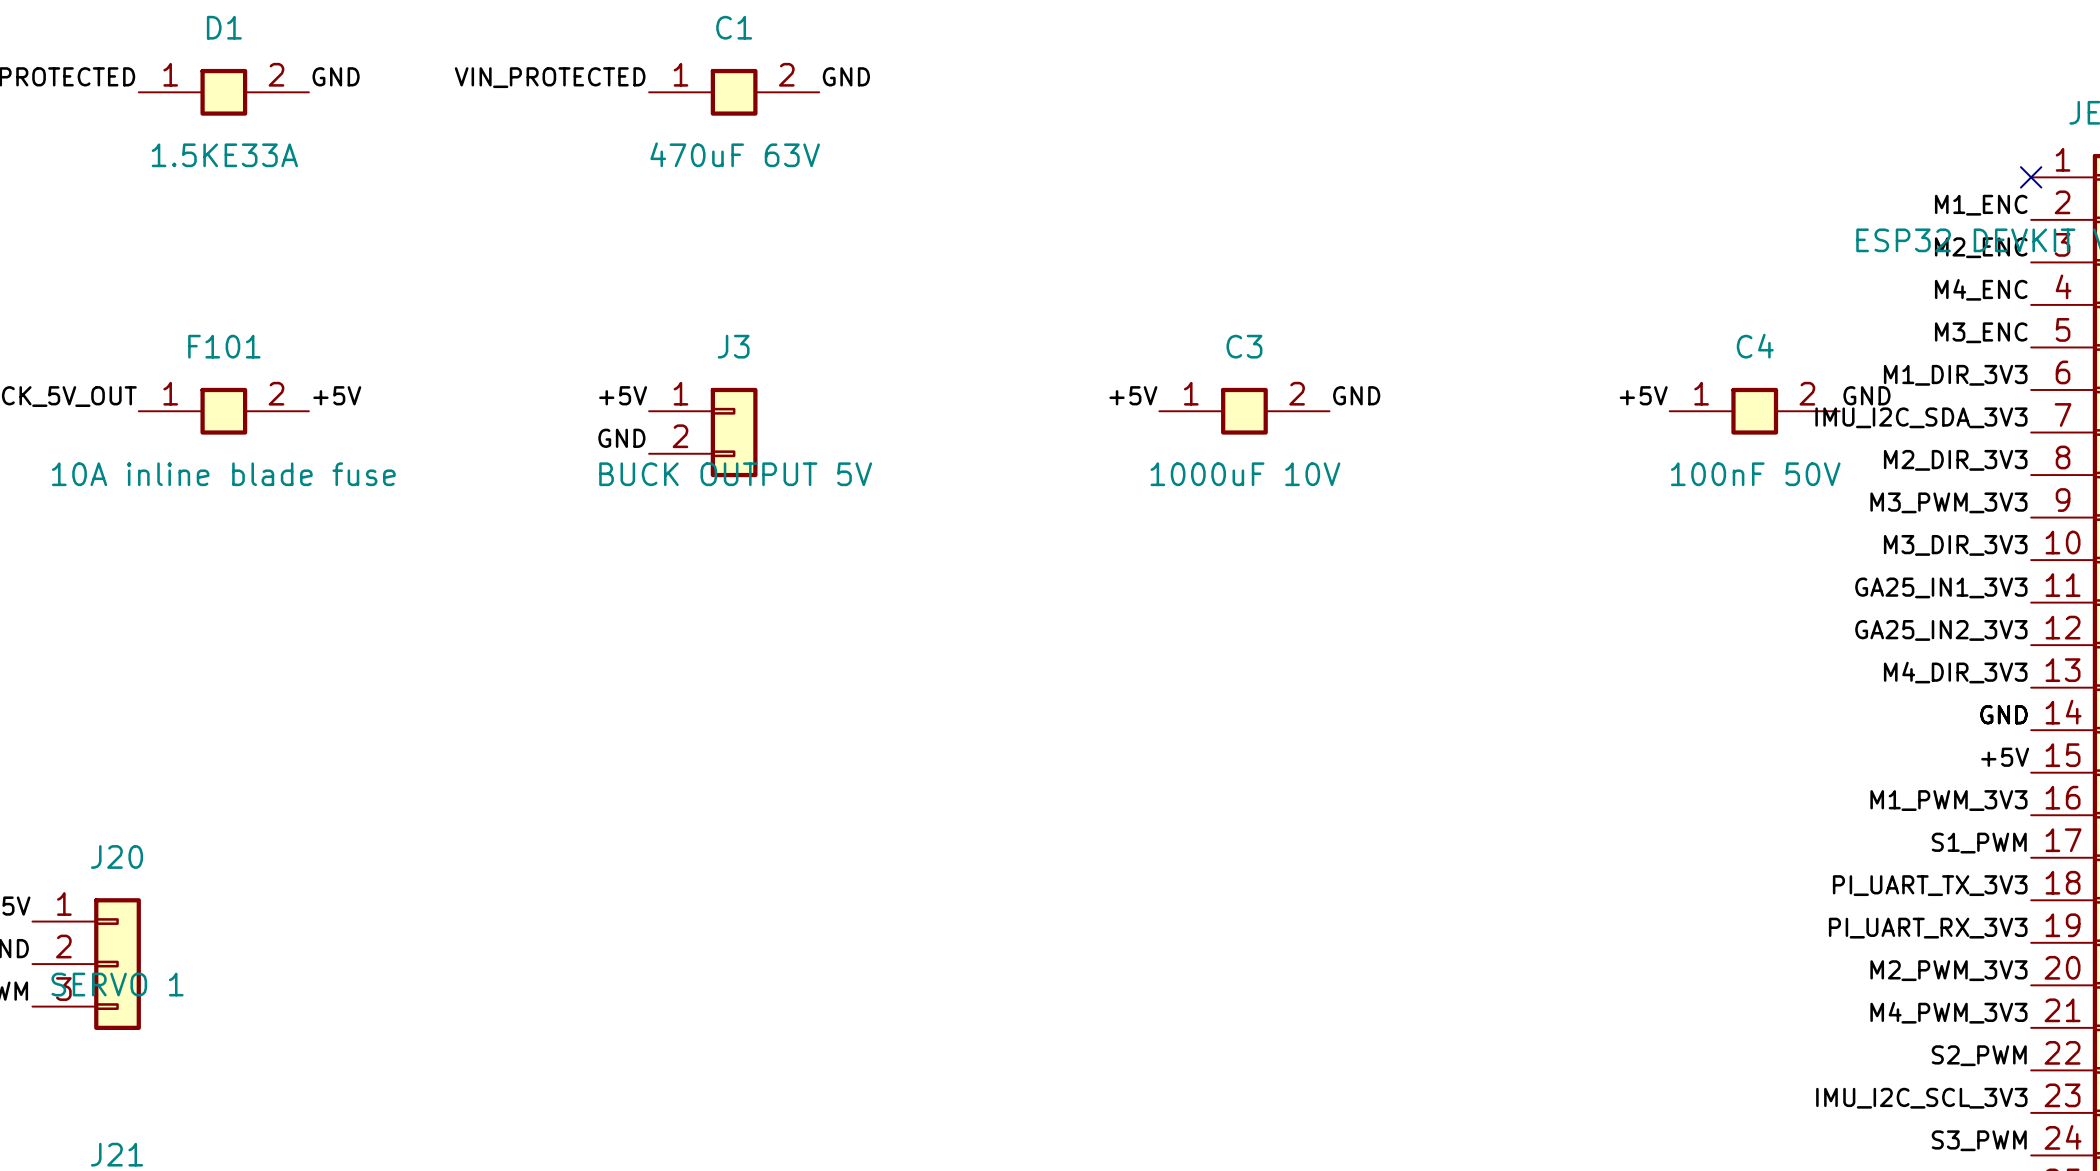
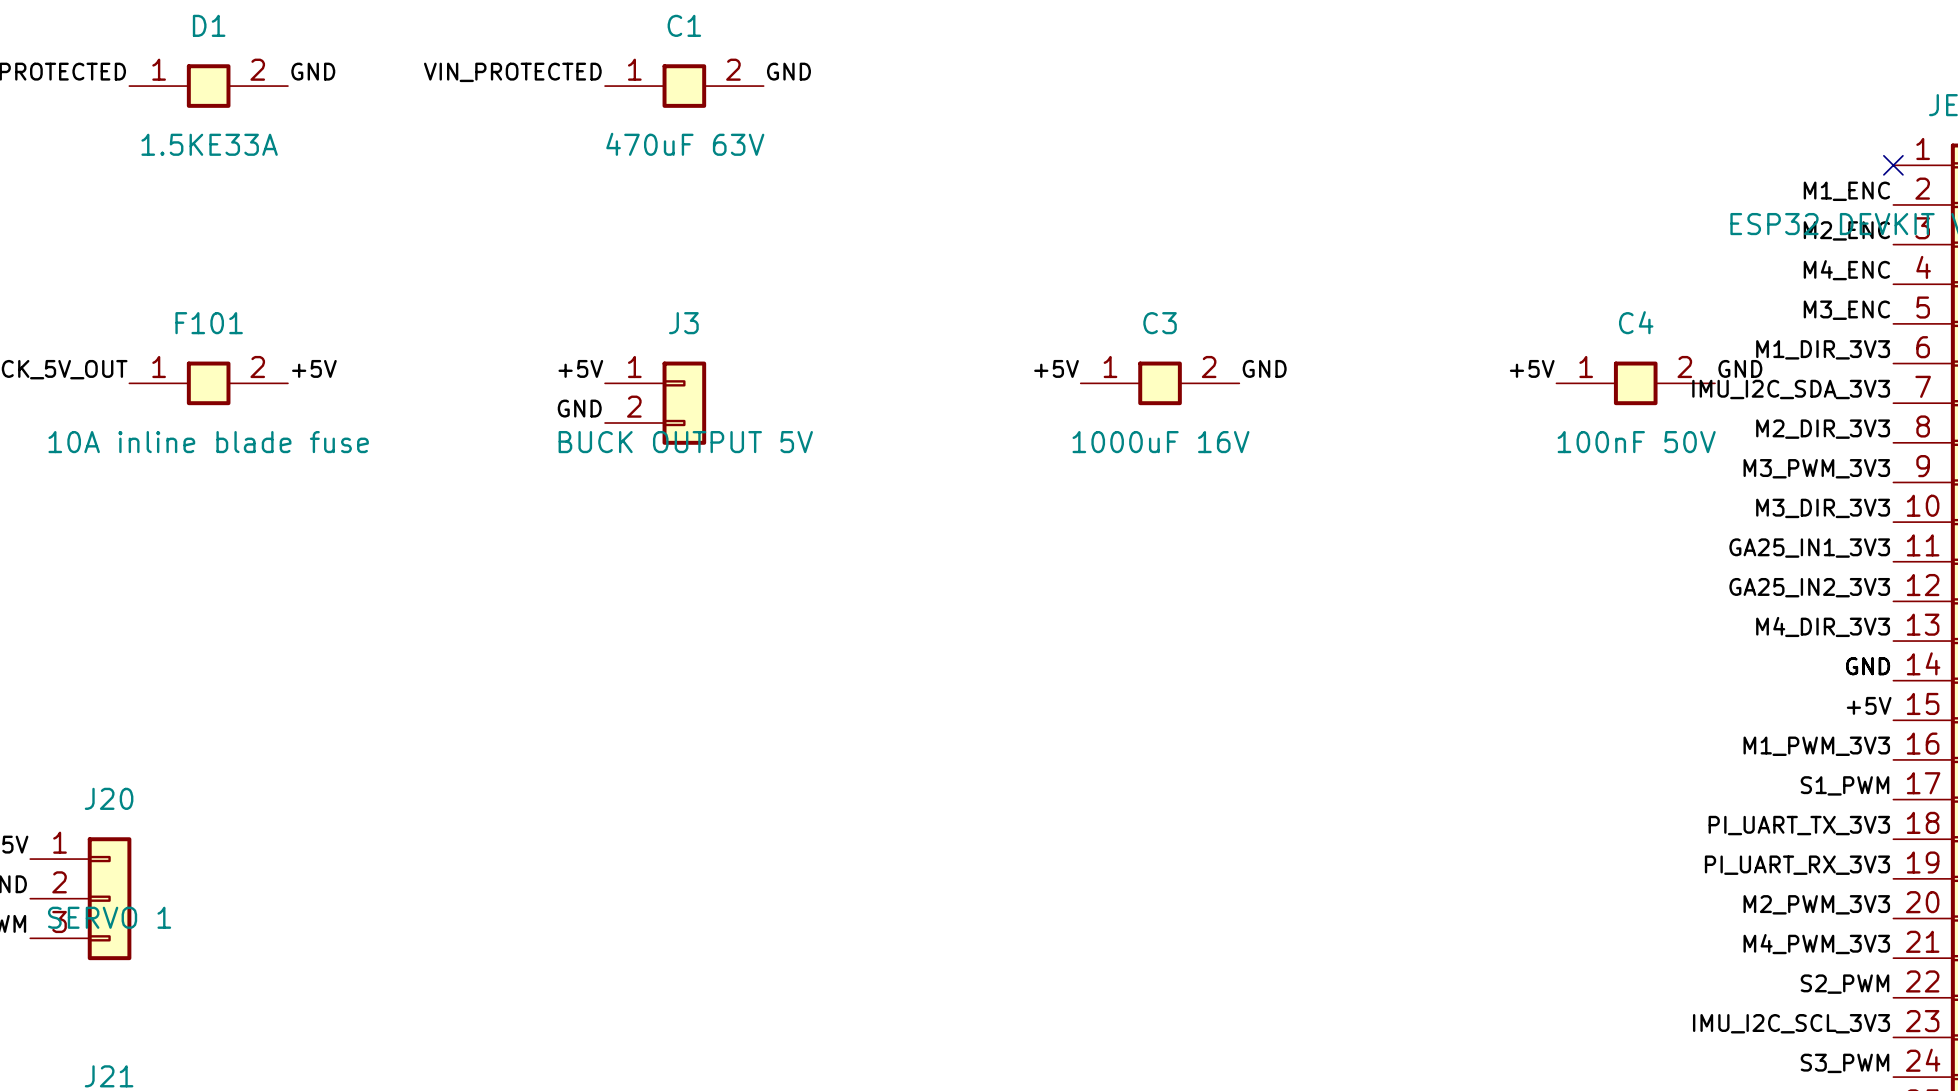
C3 value: 1000uF 10V (1245, 474) -> 1000uF 16V (1160, 442)

